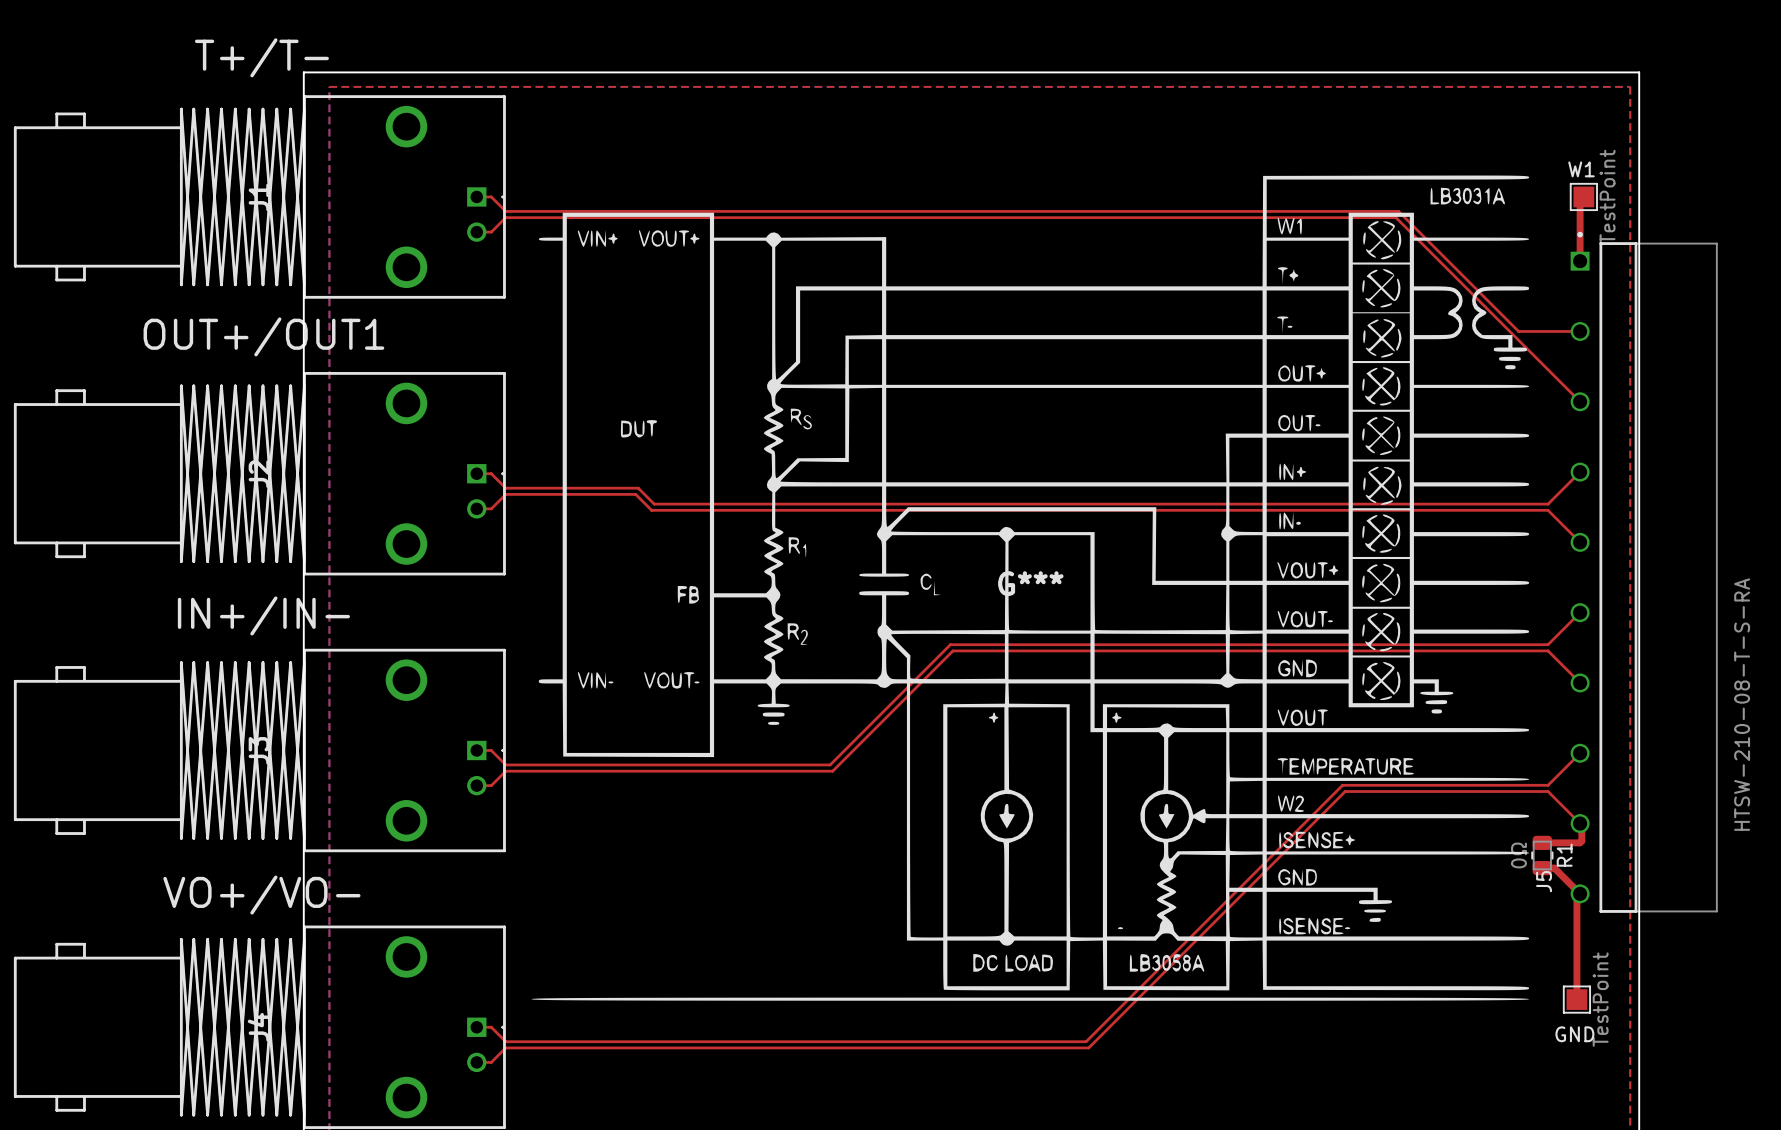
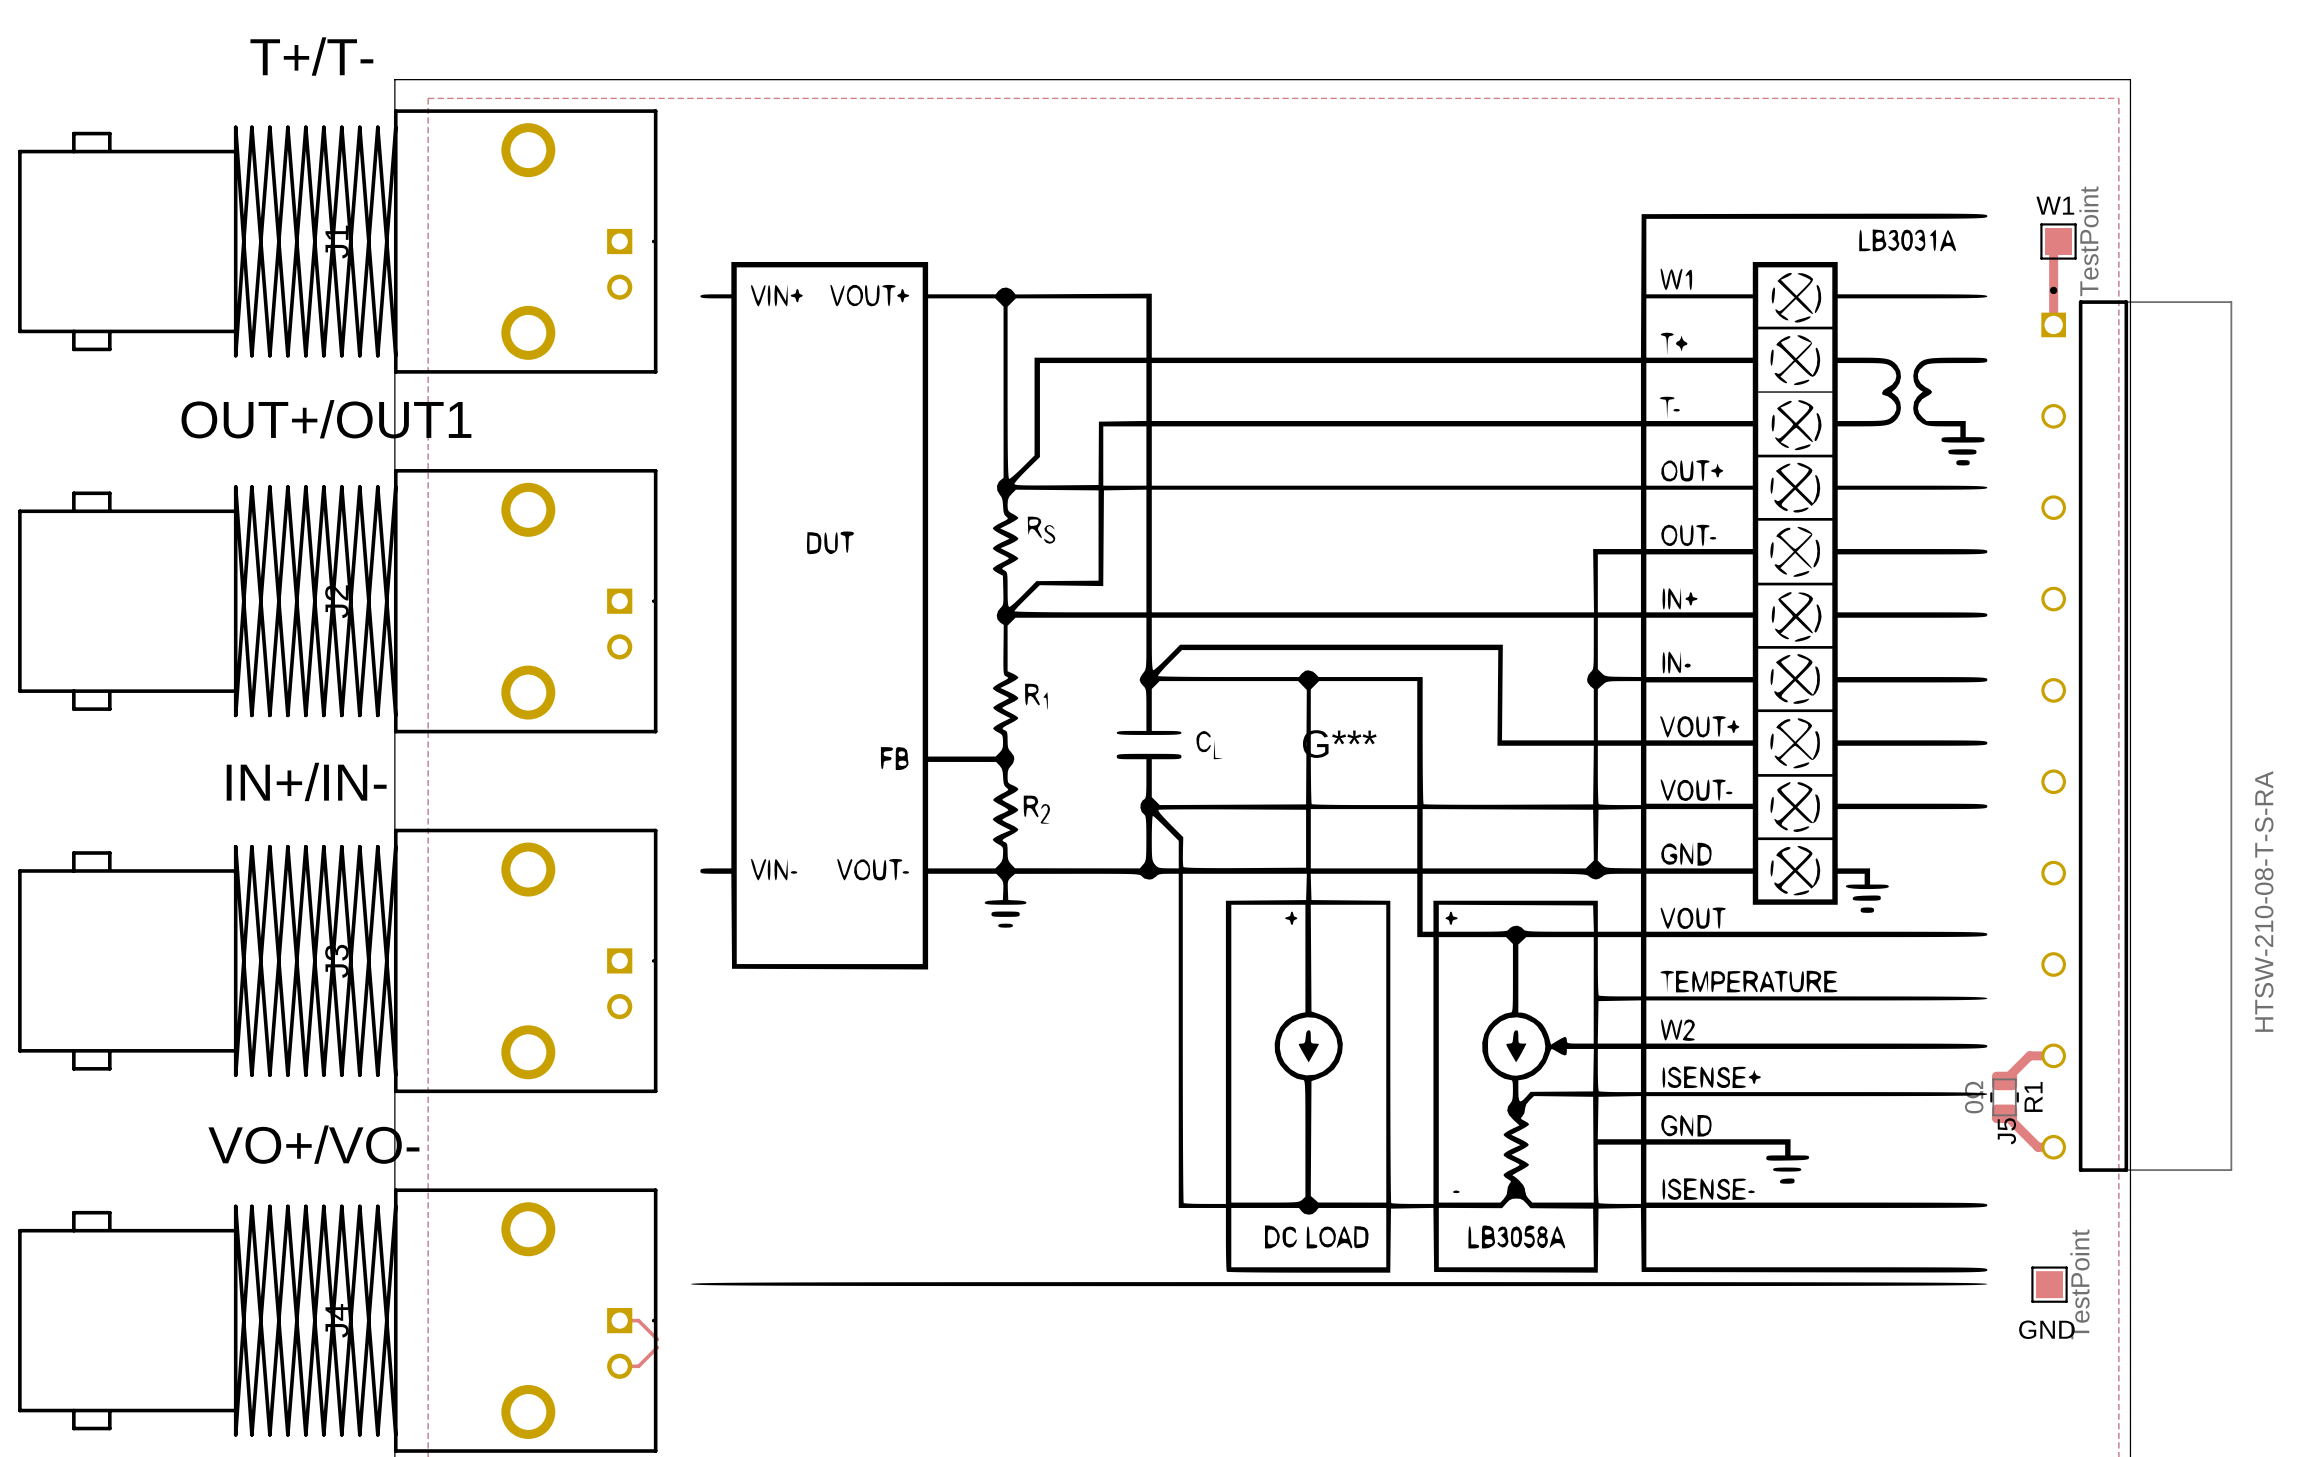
top track: (476, 196) (491, 196) (505, 211) (1398, 211) (1518, 331) (1580, 331) -> none
top track: (476, 232) (491, 232) (505, 217) (1395, 217) (1580, 401) -> none
top track: (1580, 472) (1548, 504) (654, 504) (638, 488) (505, 488) (491, 473) (476, 473) -> none
top track: (476, 508) (491, 508) (505, 494) (635, 494) (651, 510) (1548, 510) (1580, 542) -> none
top track: (1580, 612) (1548, 644) (950, 644) (830, 764) (505, 764) (491, 750) (476, 750) -> none
top track: (1580, 682) (1548, 650) (952, 650) (832, 771) (505, 771) (491, 785) (476, 785) -> none
top track: (1580, 753) (1548, 785) (1342, 785) (1086, 1041) (505, 1041) -> none
top track: (1542, 842) (1580, 842) (1581, 841) (1580, 823) (1548, 791) (1345, 791) (1088, 1047) (505, 1047) -> (2004, 1080) (2029, 1055) (2053, 1055)
top track: (1542, 868) (1554, 868) (1580, 893) (1576, 897) (1576, 999) -> (2004, 1113) (2038, 1147) (2053, 1147)

